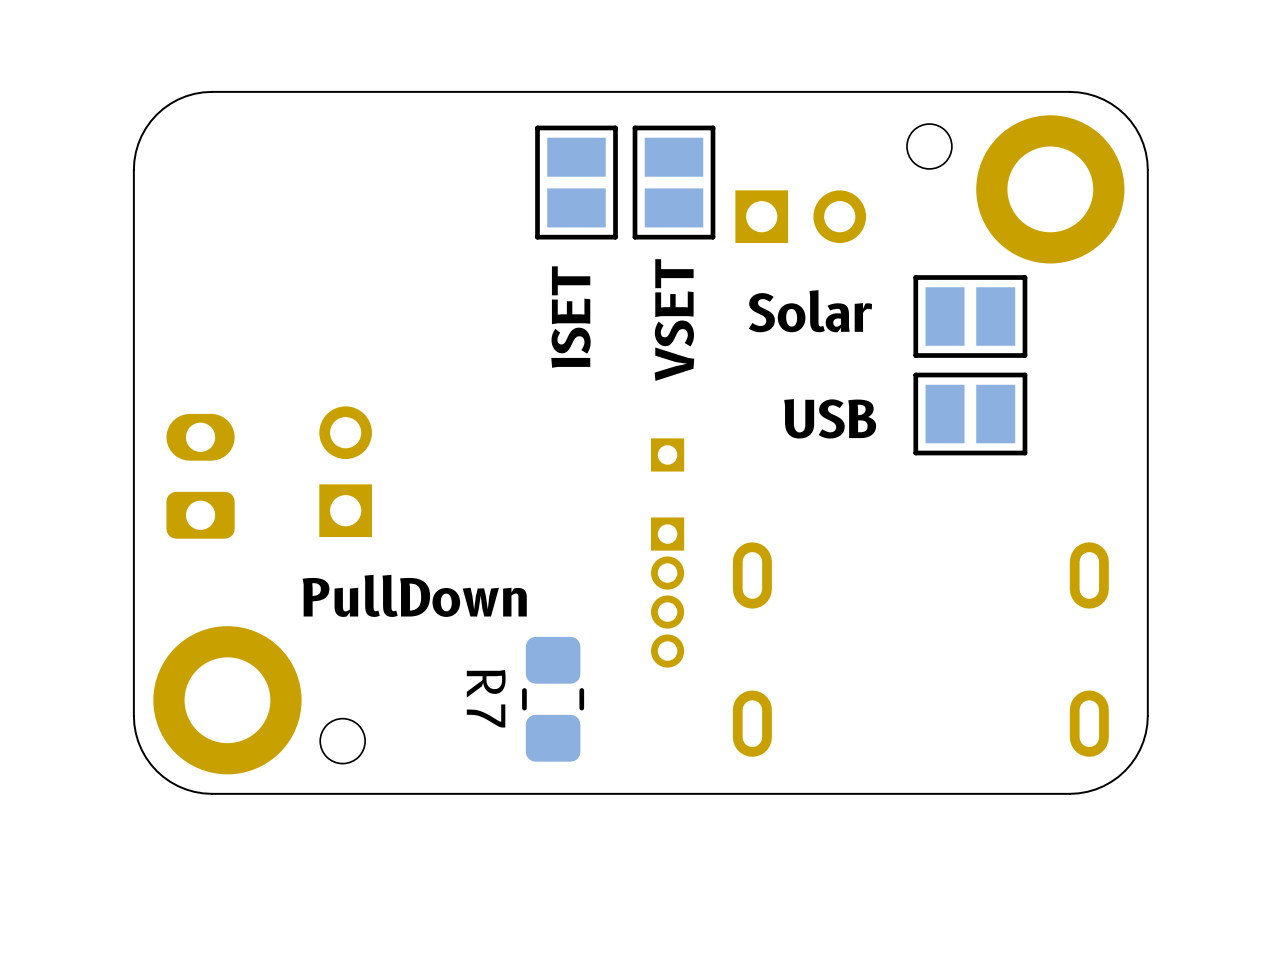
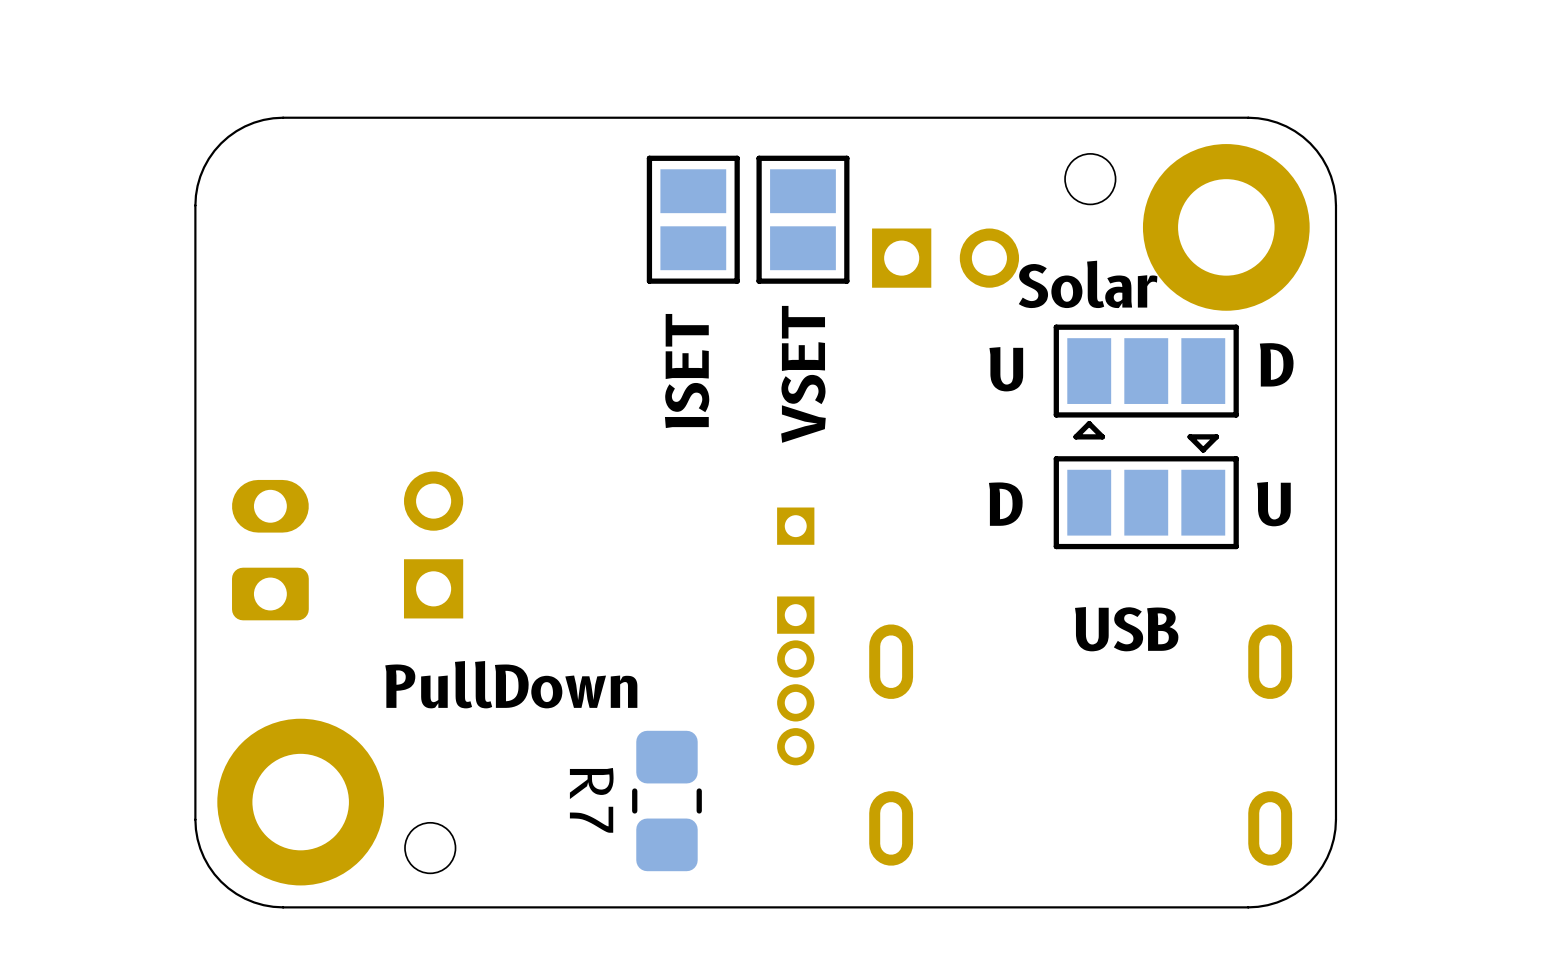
part footprint: [913, 275, 1028, 358] -> [1053, 324, 1239, 440]
text position: Solar (810, 311) -> Solar (1088, 284)
text: none -> D (1276, 364)
text: none -> U (1006, 369)
part footprint: [913, 372, 1028, 456] -> [1053, 434, 1239, 550]
text position: USB (830, 418) -> USB (1126, 629)
text: none -> D (1005, 504)
text: none -> U (1273, 504)

